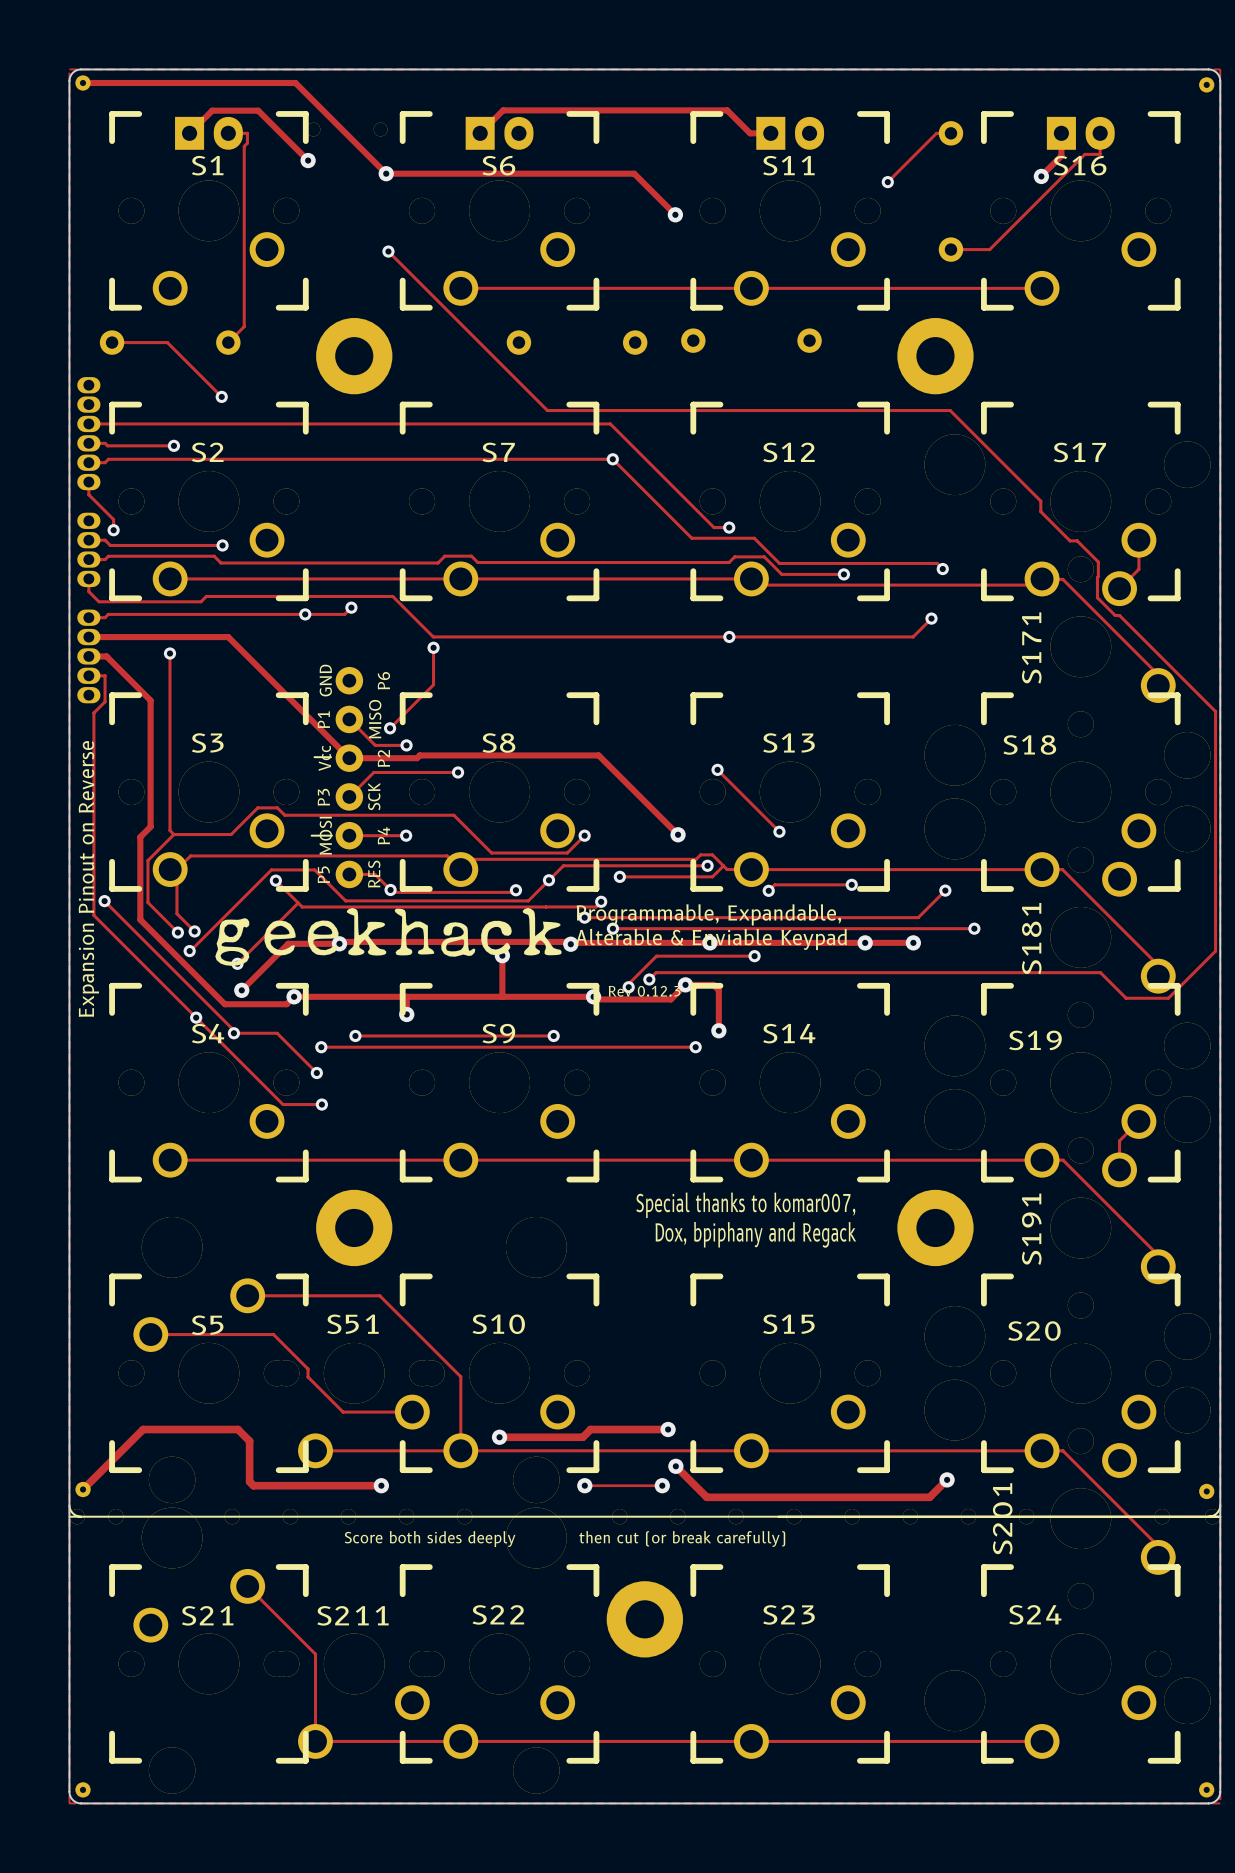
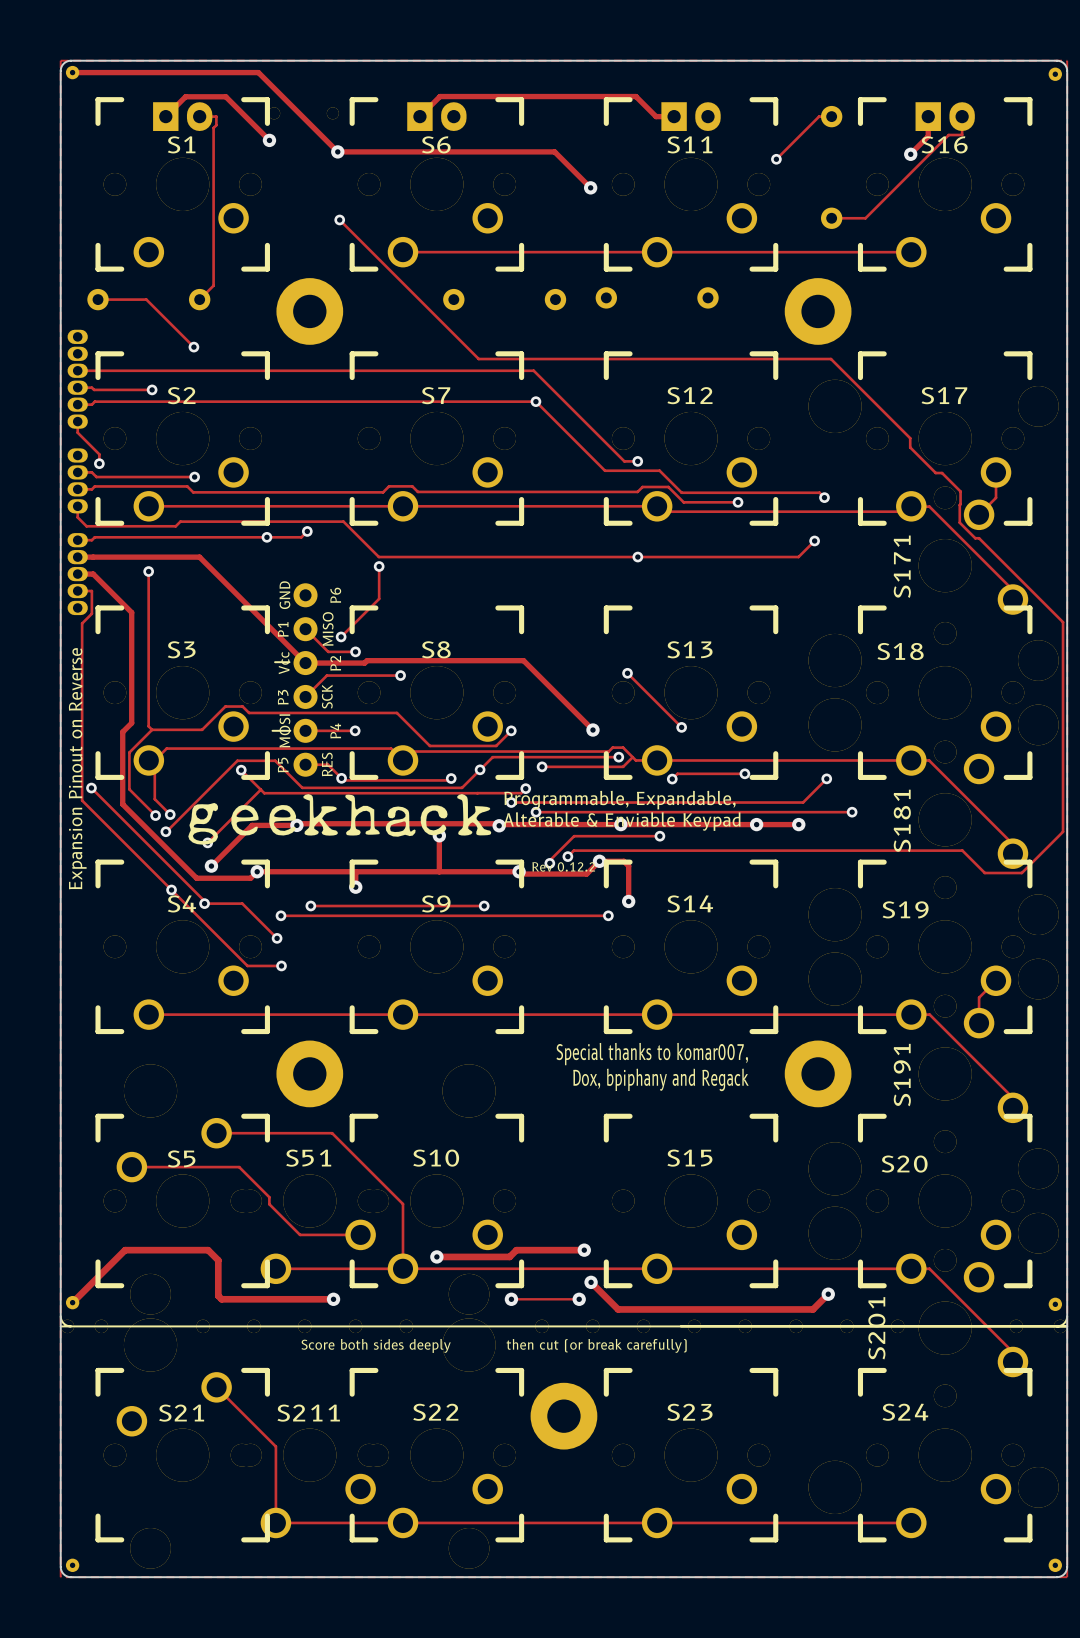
text: Rev 0.12.3 (644, 991) -> Rev 0.12.2 (563, 866)

